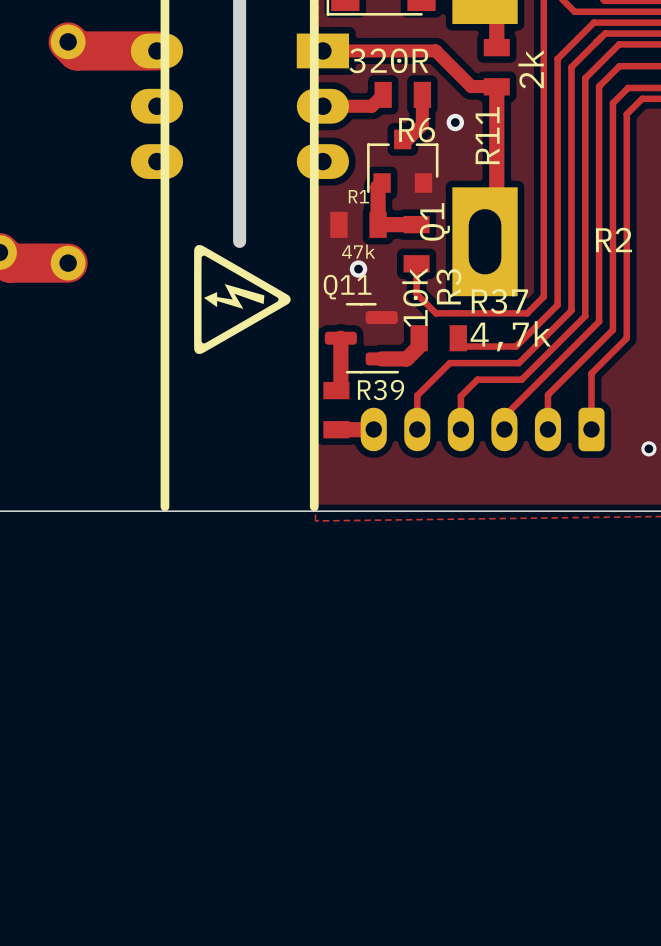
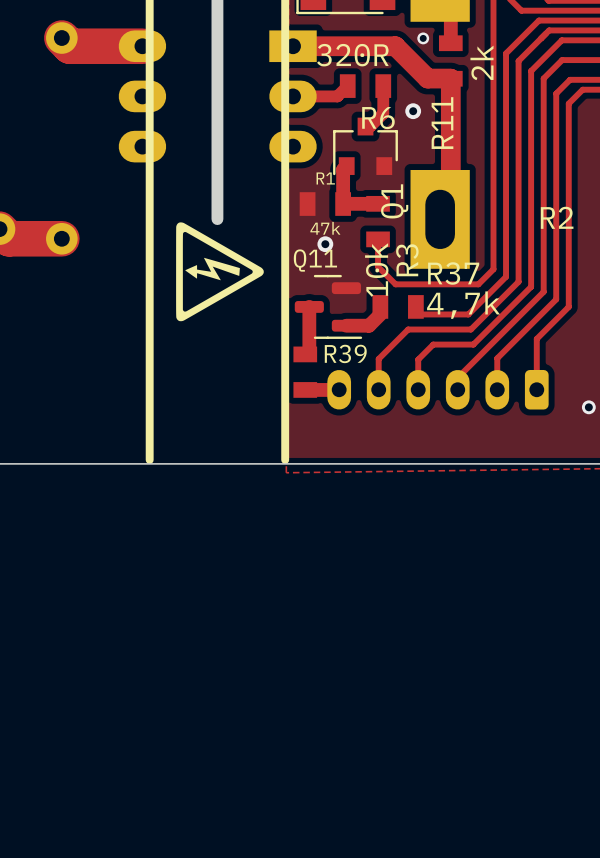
via: none -> (423, 38)
track width: thin (322, 50) (435, 50) (471, 86) (496, 86) -> thick (293, 46) (395, 46) (427, 78) (450, 78)
track width: thin (496, 86) (496, 230) -> thick (450, 78) (450, 208)

